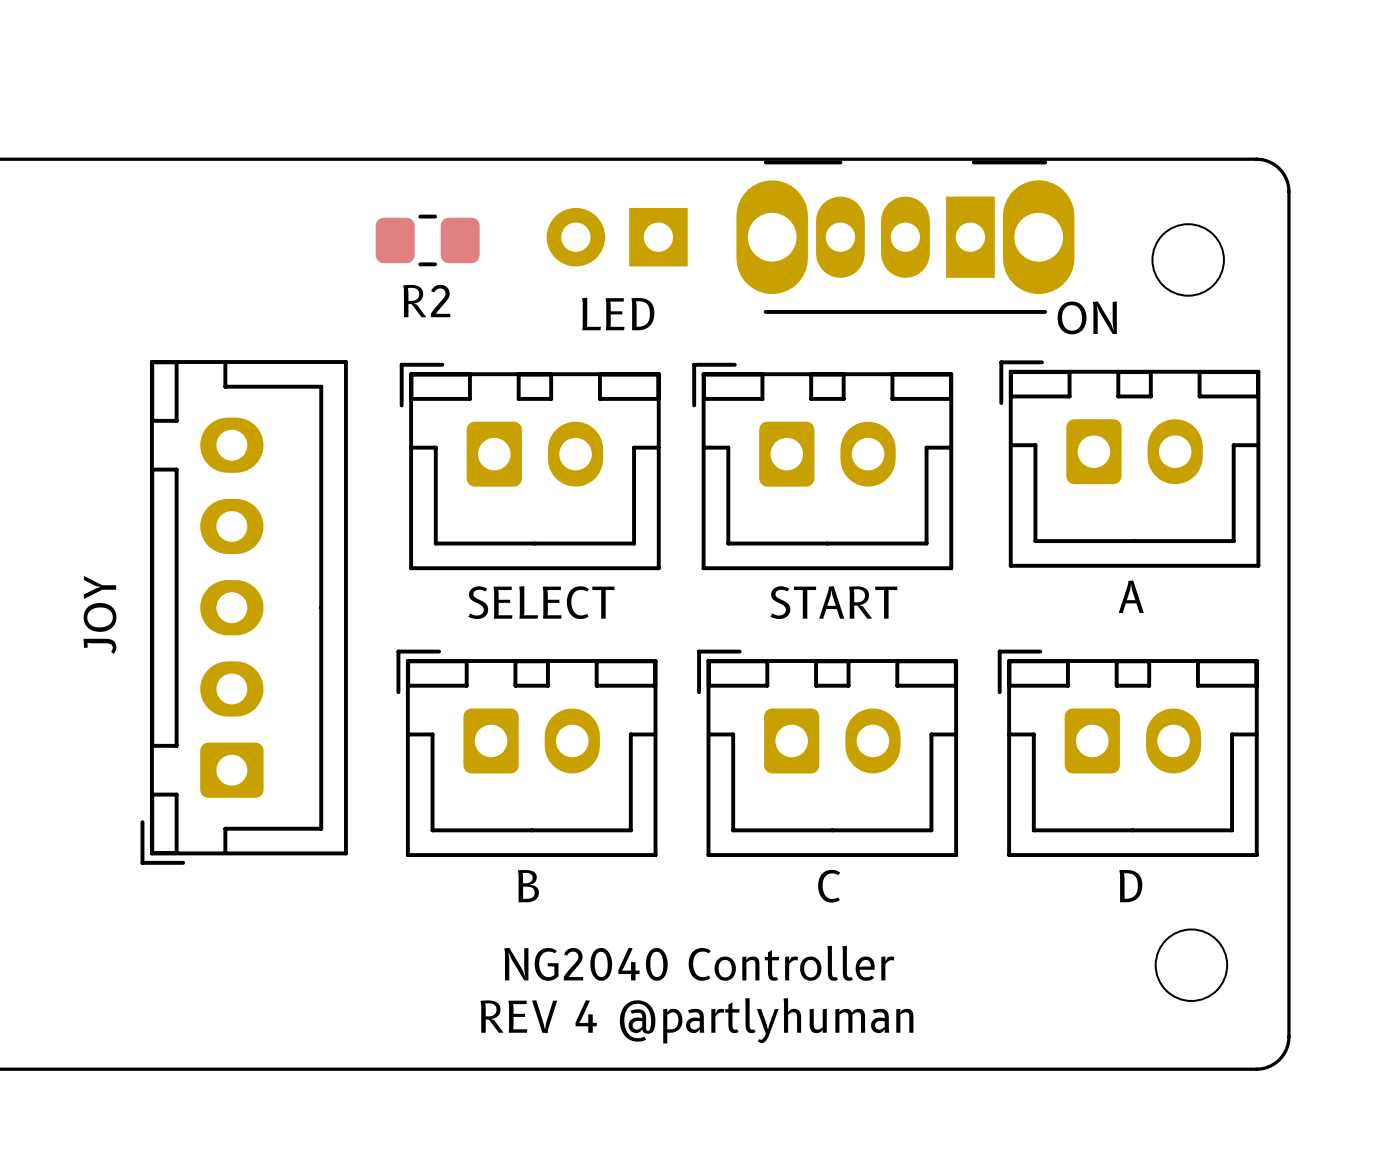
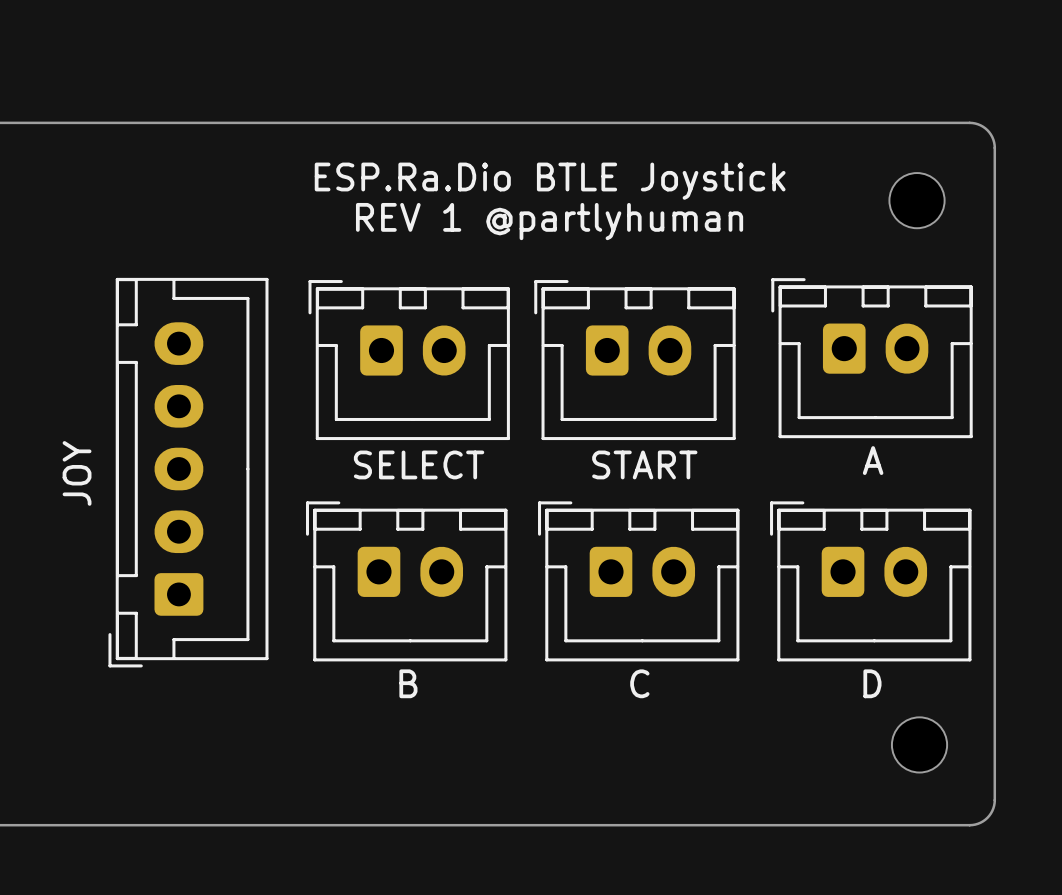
text: none -> ESP.Ra.Dio BTLE Joystick (550, 181)
part: LED (617, 237) -> none
part: (905, 237) -> none
R2: (427, 240) -> none
text: none -> REV 1 @partlyhuman (549, 221)
text: ON (1087, 317) -> none
text: NG2040 Controller (699, 963) -> none
text: REV 4 @partlyhuman (696, 1020) -> none

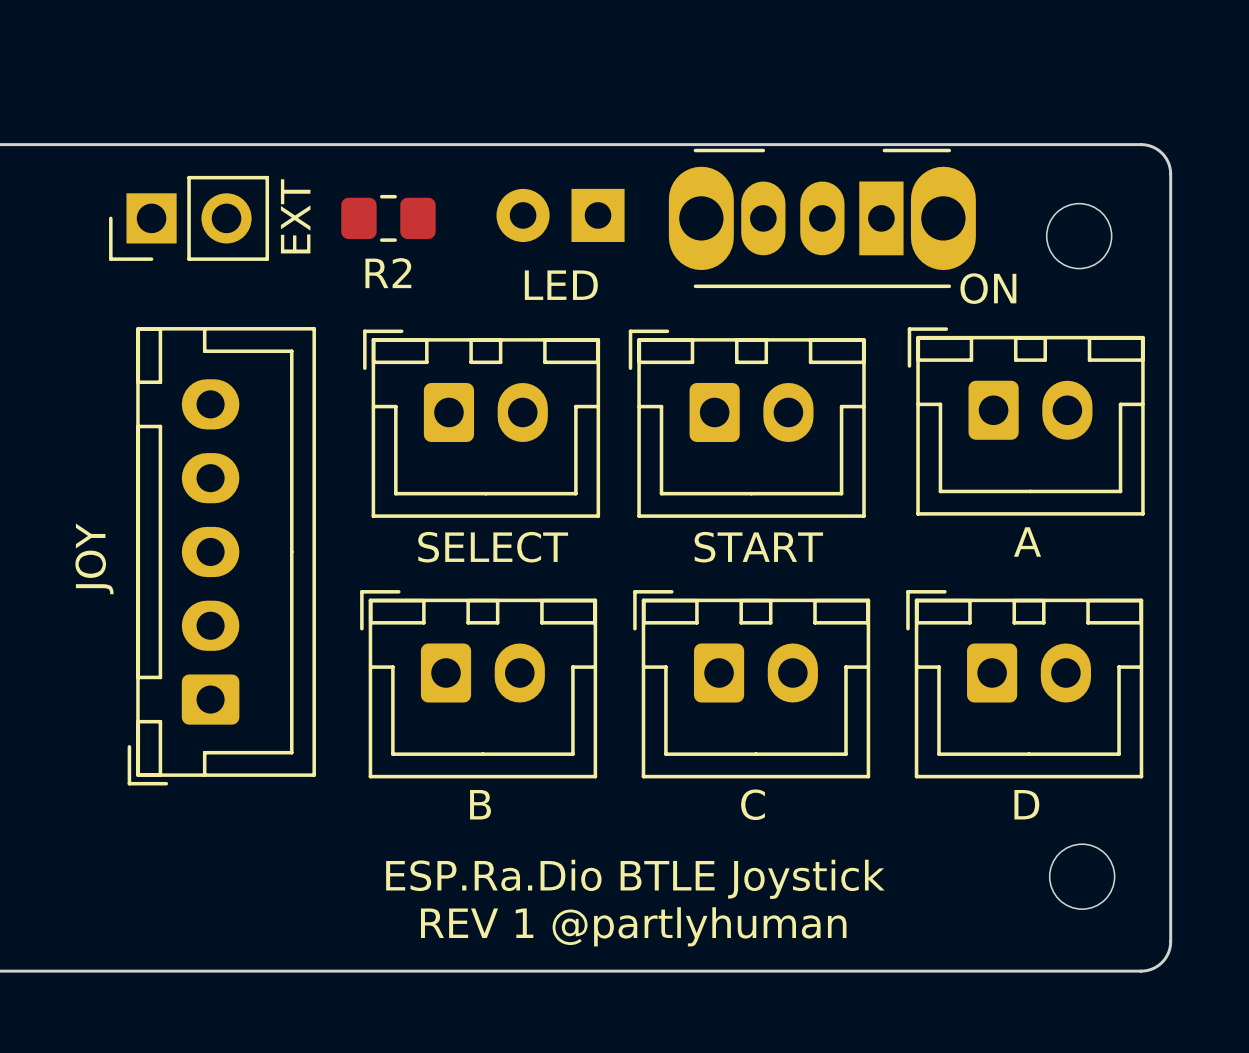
text position: ESP.Ra.Dio BTLE Joystick (550, 181) -> ESP.Ra.Dio BTLE Joystick (635, 879)
part: none -> LED (560, 215)
part: none -> EXT (189, 218)
R2: none -> (388, 218)
part: none -> (822, 218)
text position: REV 1 @partlyhuman (549, 221) -> REV 1 @partlyhuman (633, 926)
text: none -> ON (988, 288)

